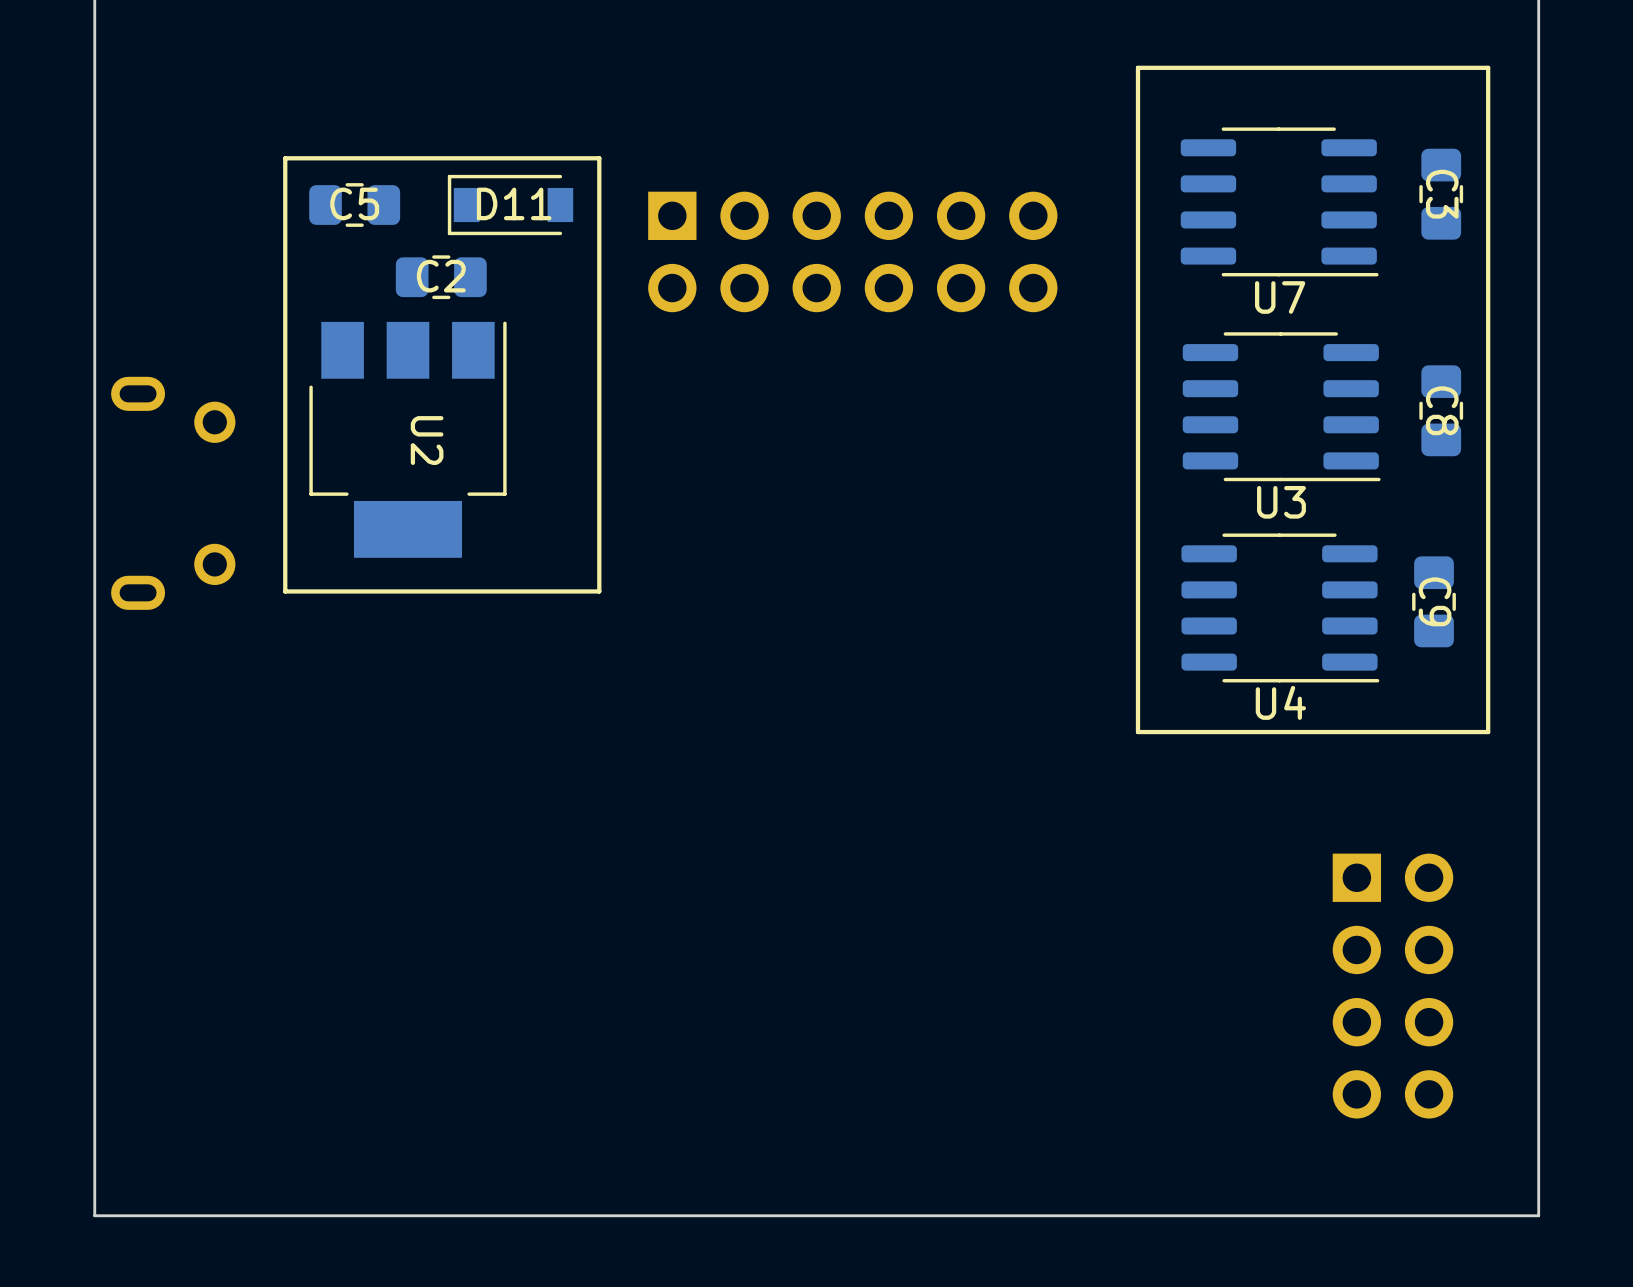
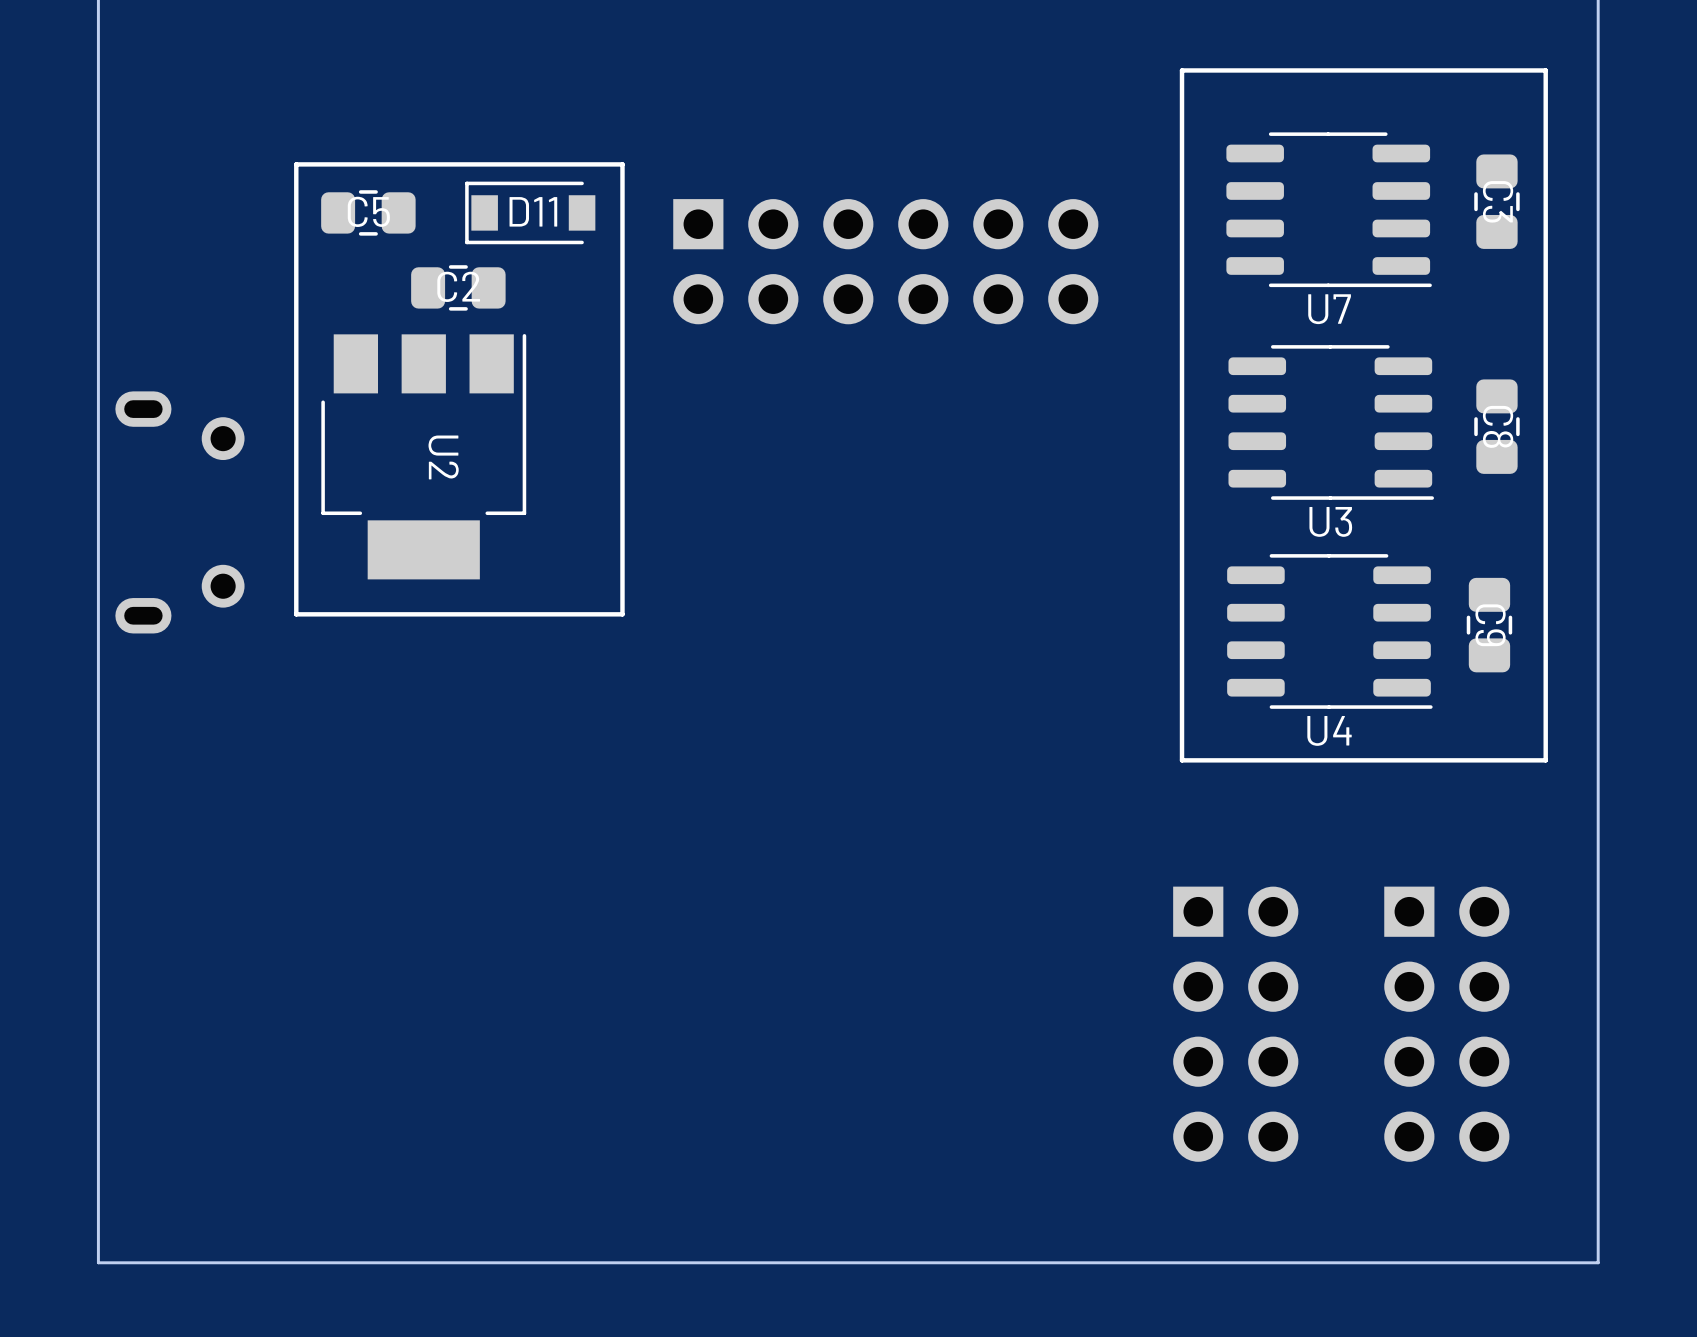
part: none -> (1235, 1024)

